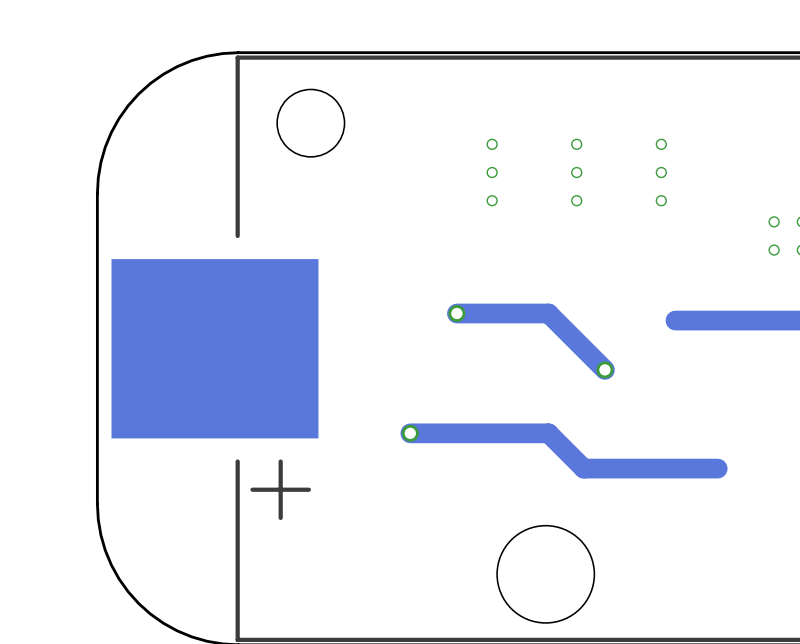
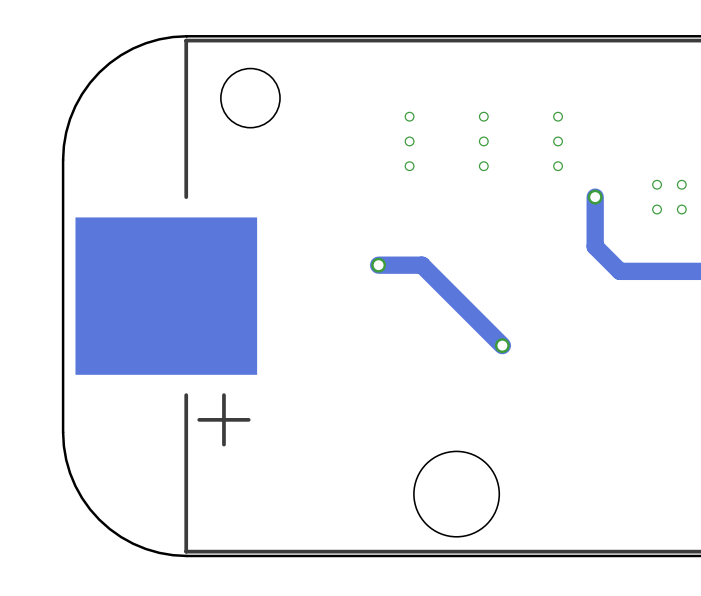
via: none -> (595, 197)
track: (506, 313) (548, 313) (604, 369) -> (421, 265) (502, 345)
track: (731, 320) (675, 320) -> (619, 271) (595, 246) (595, 197)
via position: (604, 369) -> (502, 345)
track: (410, 433) (548, 433) (583, 468) (717, 468) -> none
via: (410, 433) -> none

